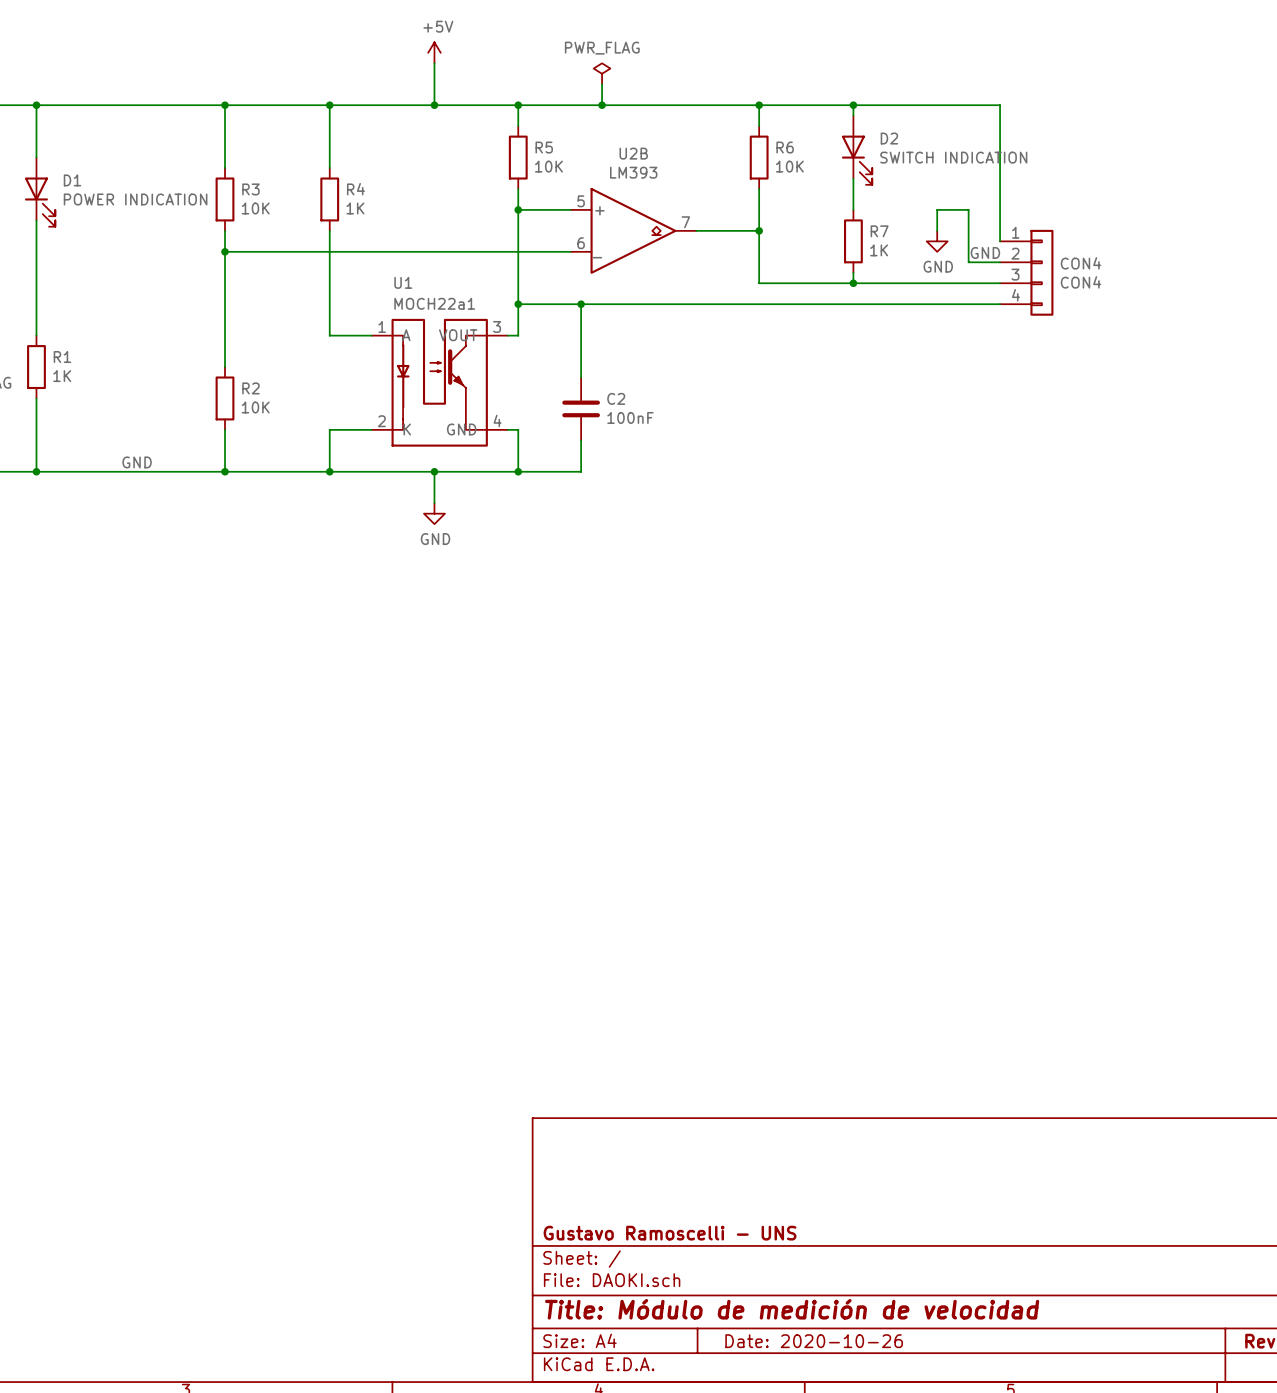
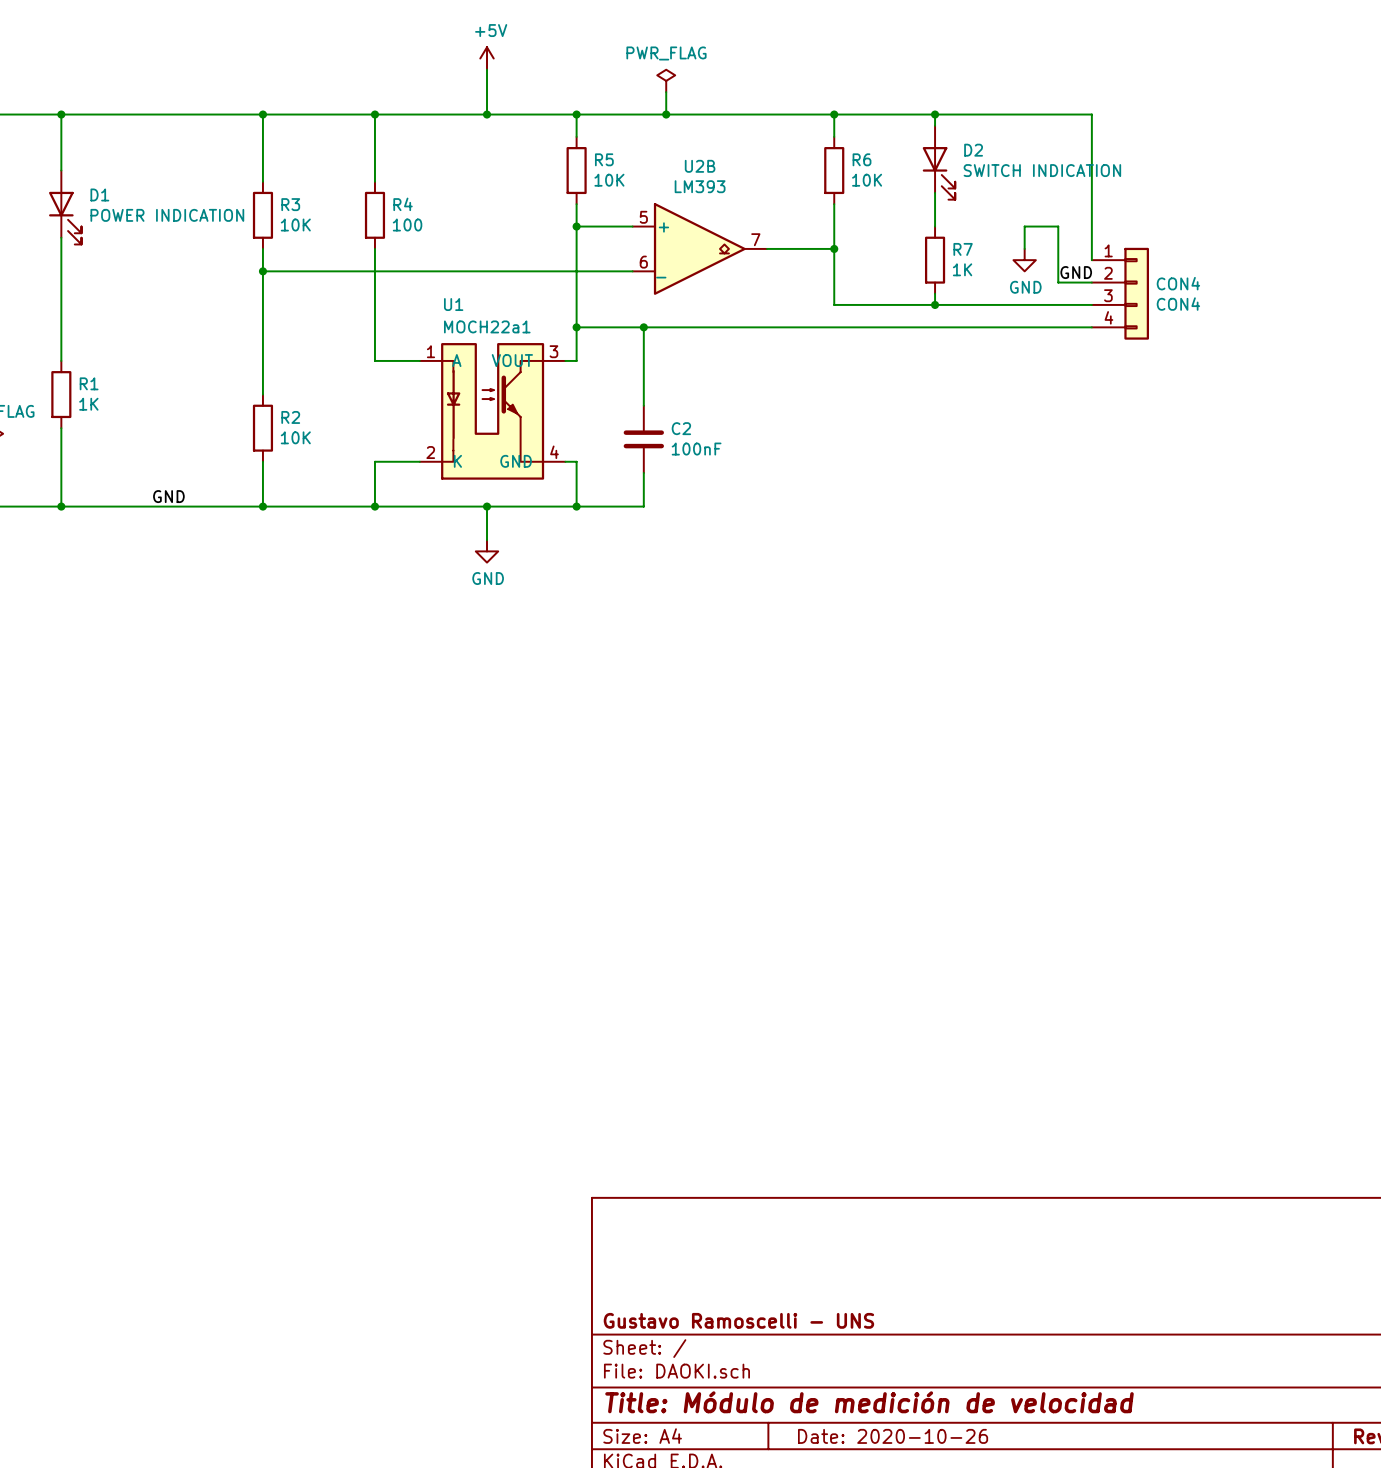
R4 value: 1K (355, 208) -> 100 (407, 225)

